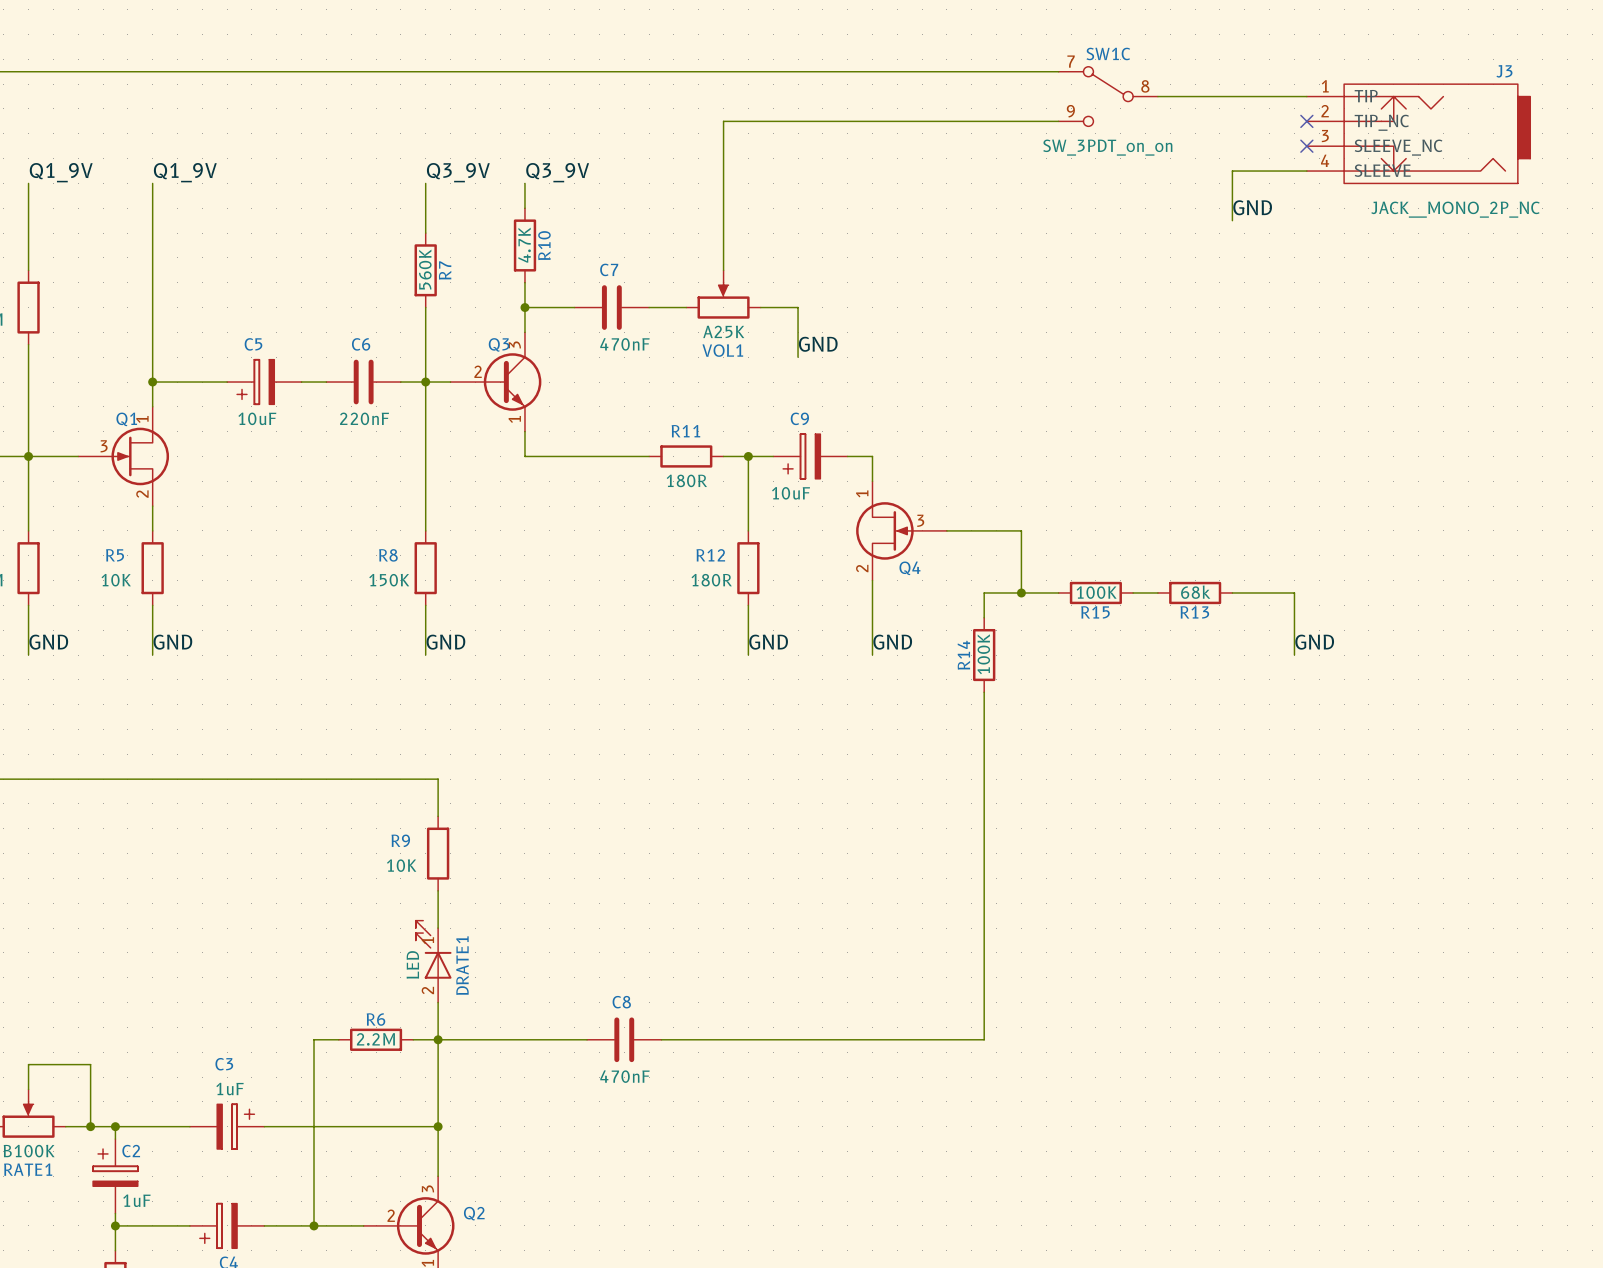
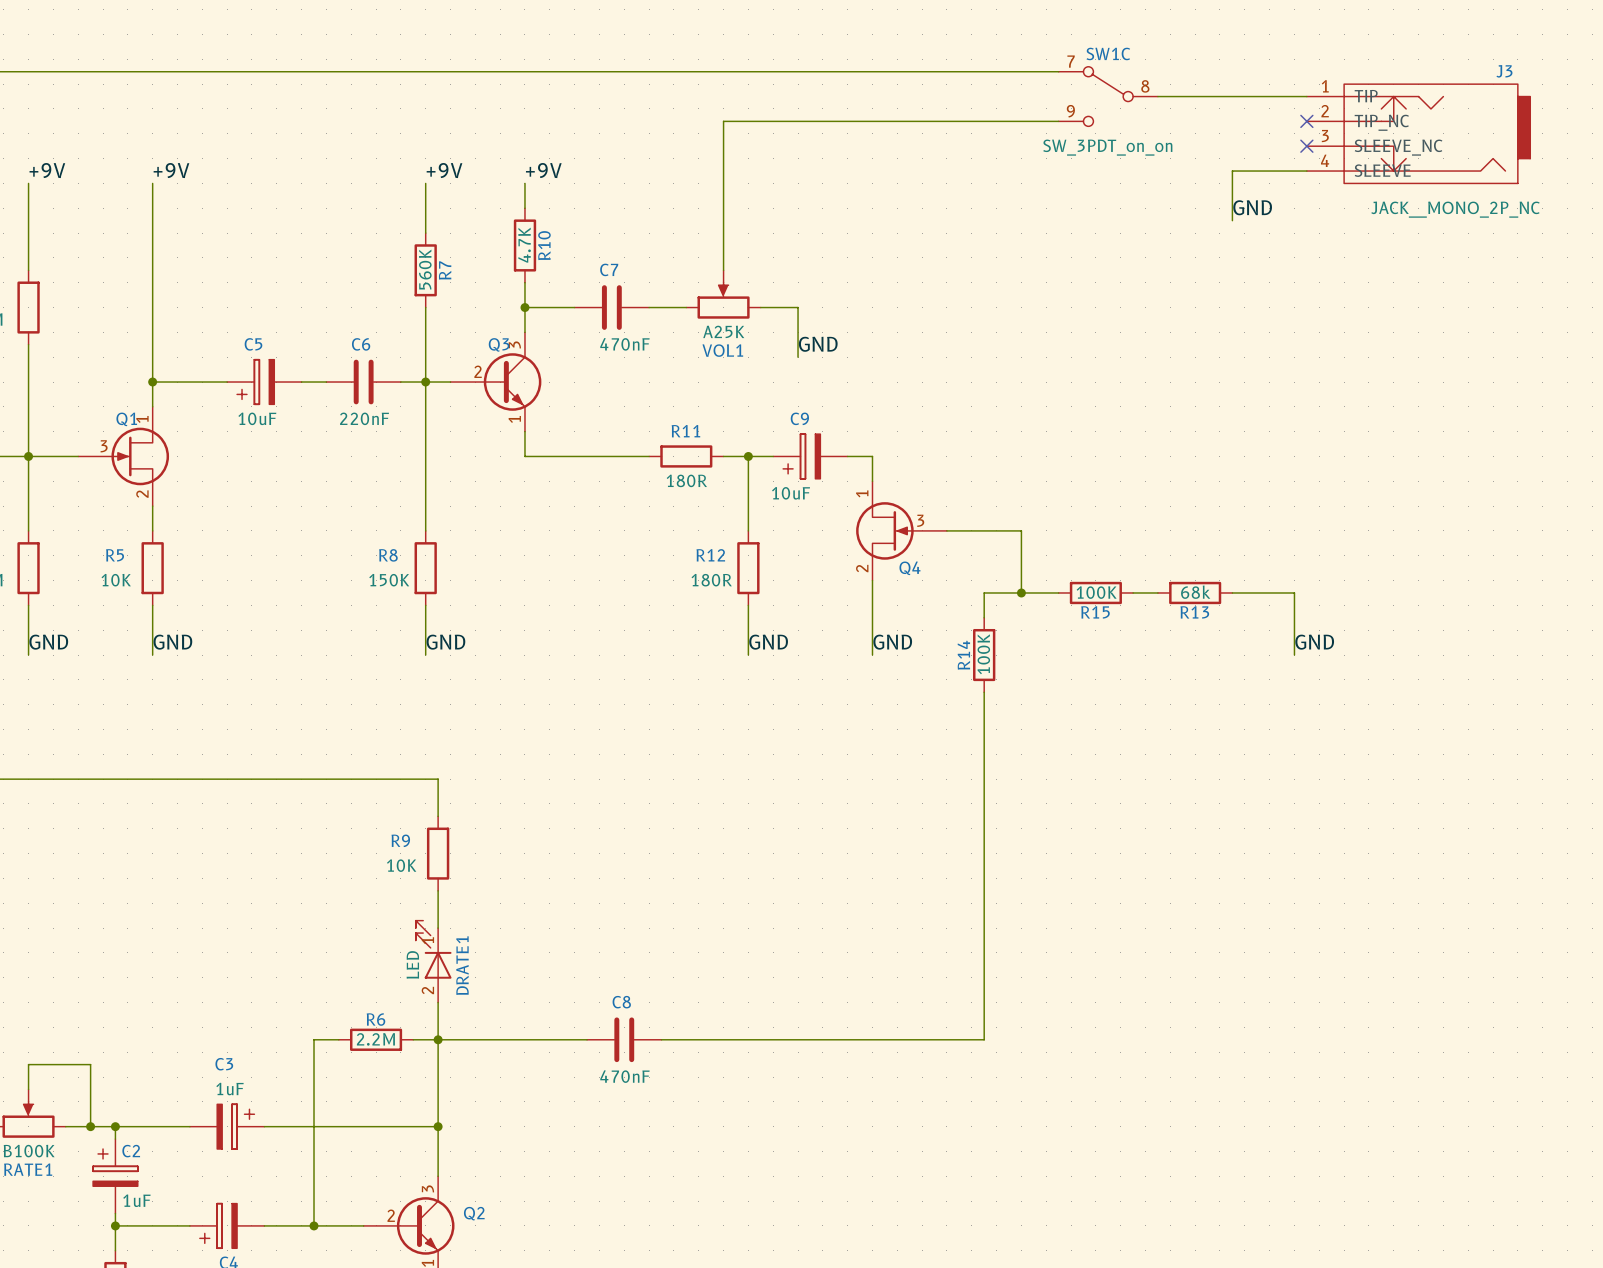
label: Q1_9V (61, 172) -> +9V (47, 170)
label: Q1_9V (185, 172) -> +9V (171, 170)
label: Q3_9V (458, 172) -> +9V (444, 170)
label: Q3_9V (557, 172) -> +9V (543, 170)

